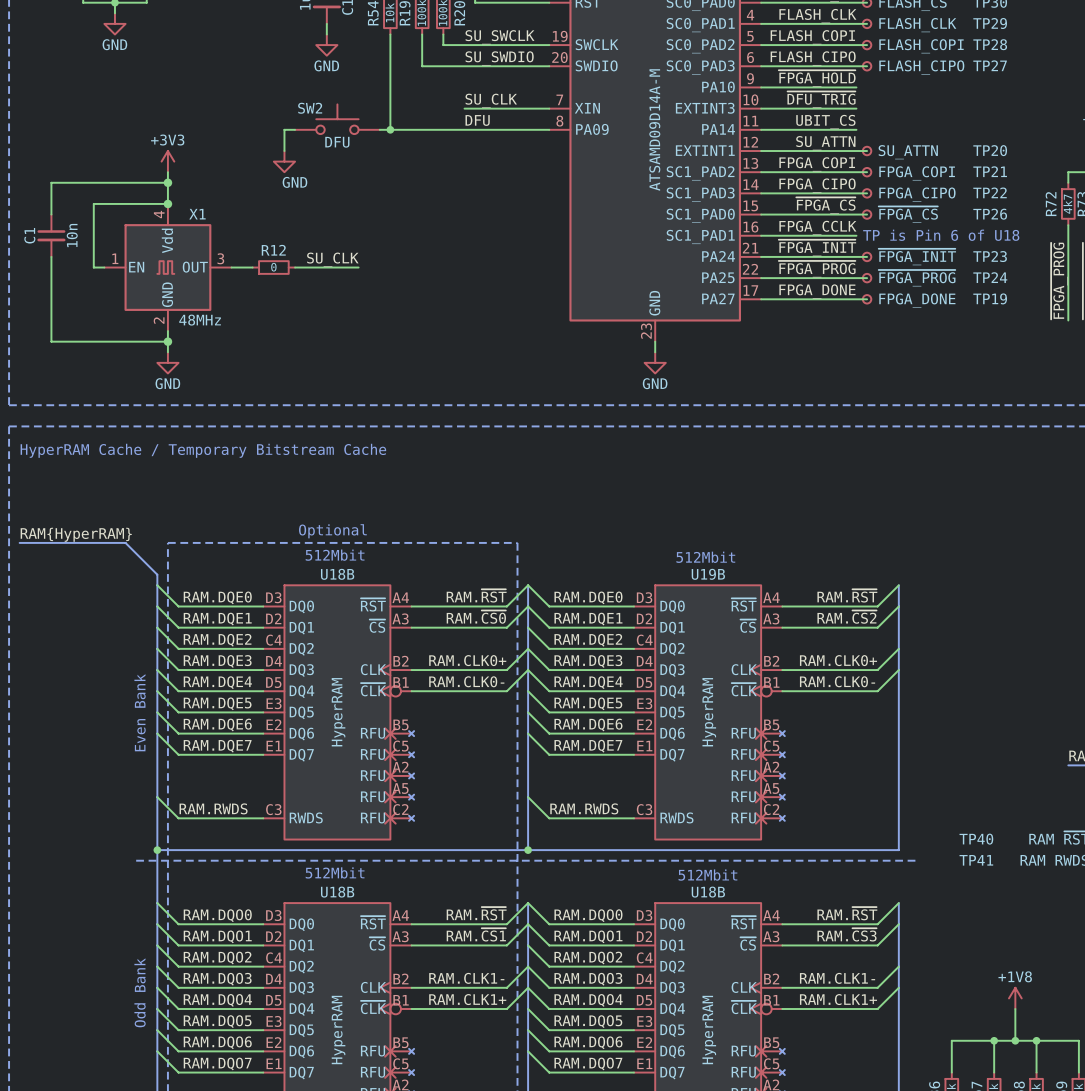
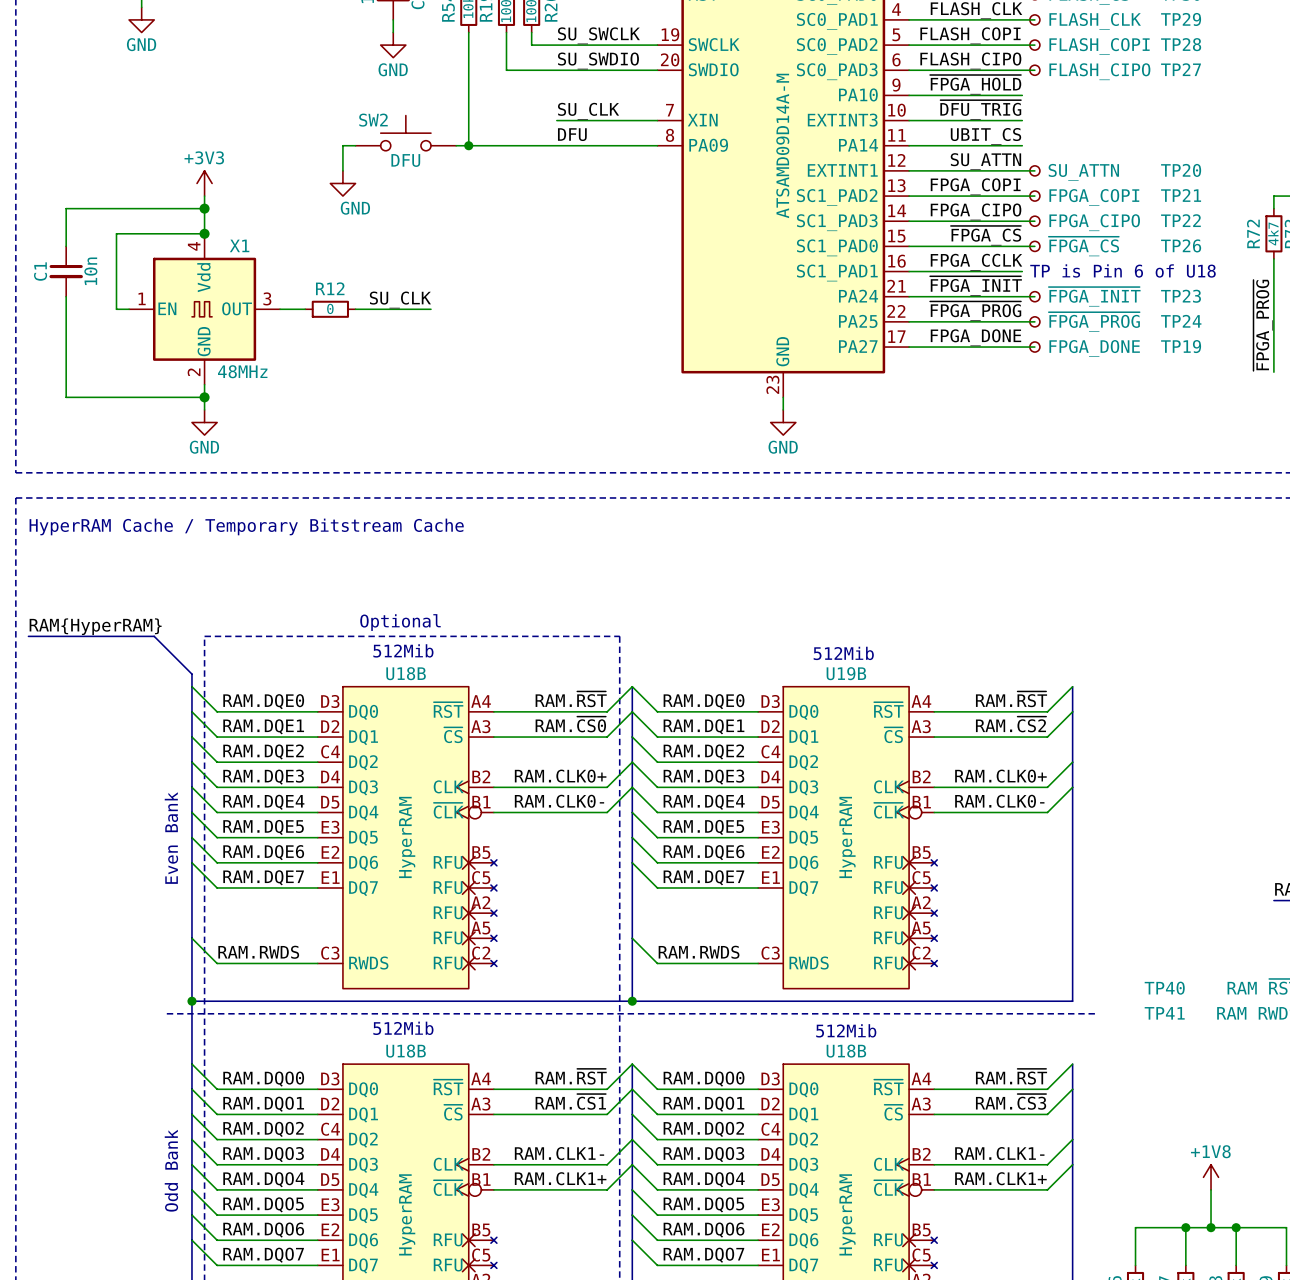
text: 512Mbit (335, 555) -> 512Mib (403, 650)
text: 512Mbit (705, 557) -> 512Mib (843, 653)
text: 512Mbit (335, 872) -> 512Mib (403, 1028)
text: 512Mbit (707, 875) -> 512Mib (846, 1030)

